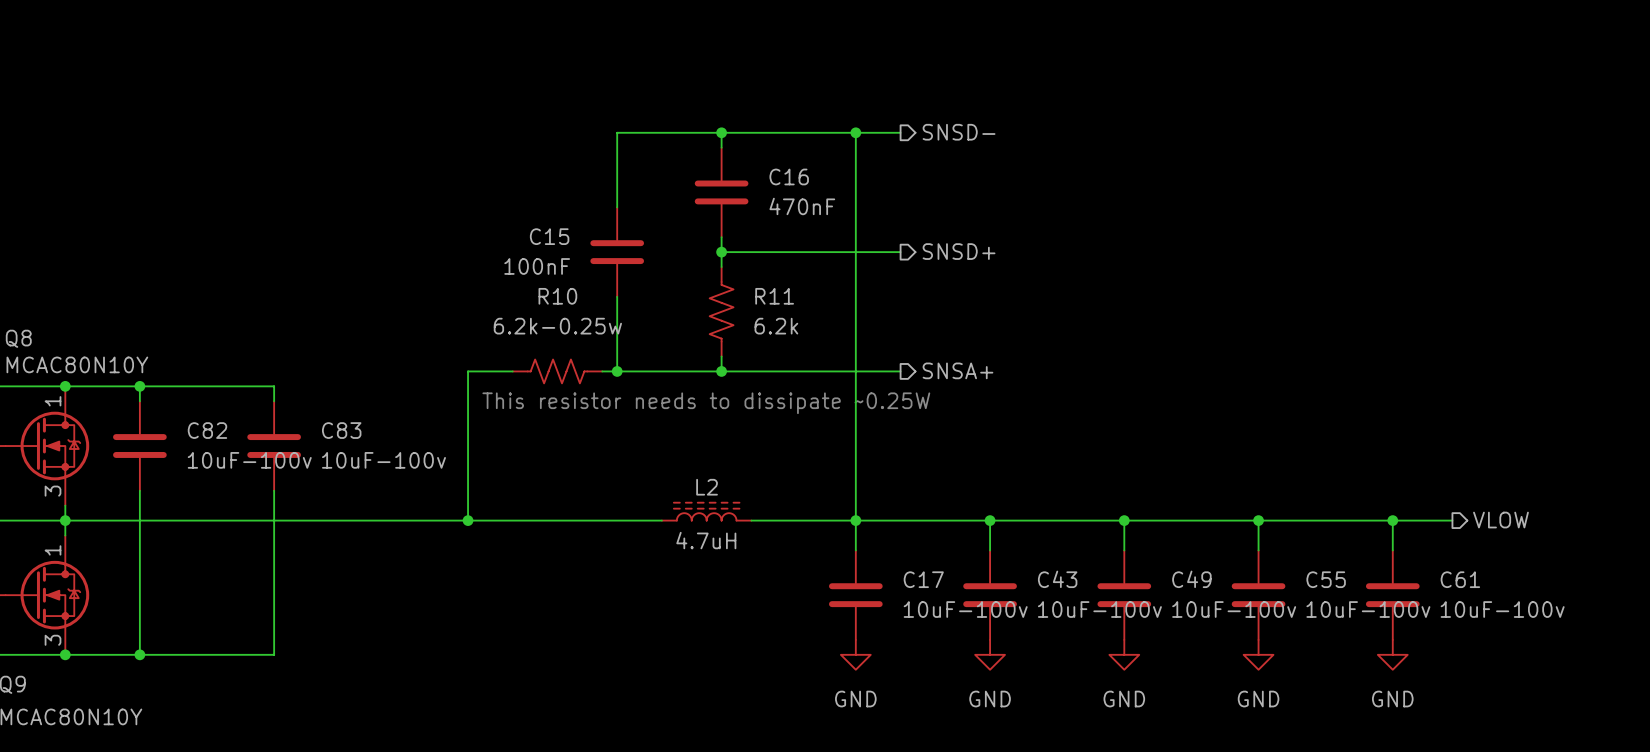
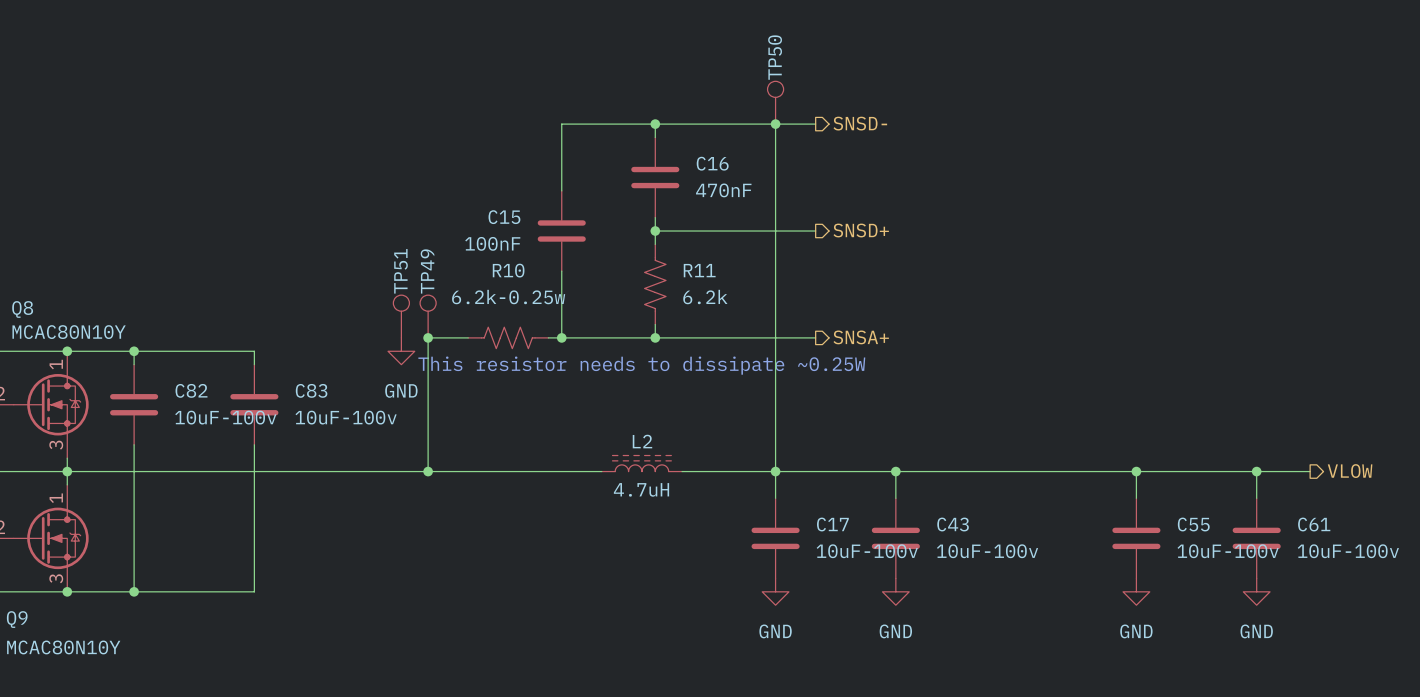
TP50: none -> (775, 102)
TP51: none -> (401, 316)
TP49: none -> (428, 316)
junction: none -> (428, 337)
power symbol: none -> GND (401, 351)
wire: (1124, 520) (1124, 550) -> none
junction: (1124, 520) -> none
C49: 10uF-100v (1124, 595) -> none
power symbol: GND (1124, 654) -> none

